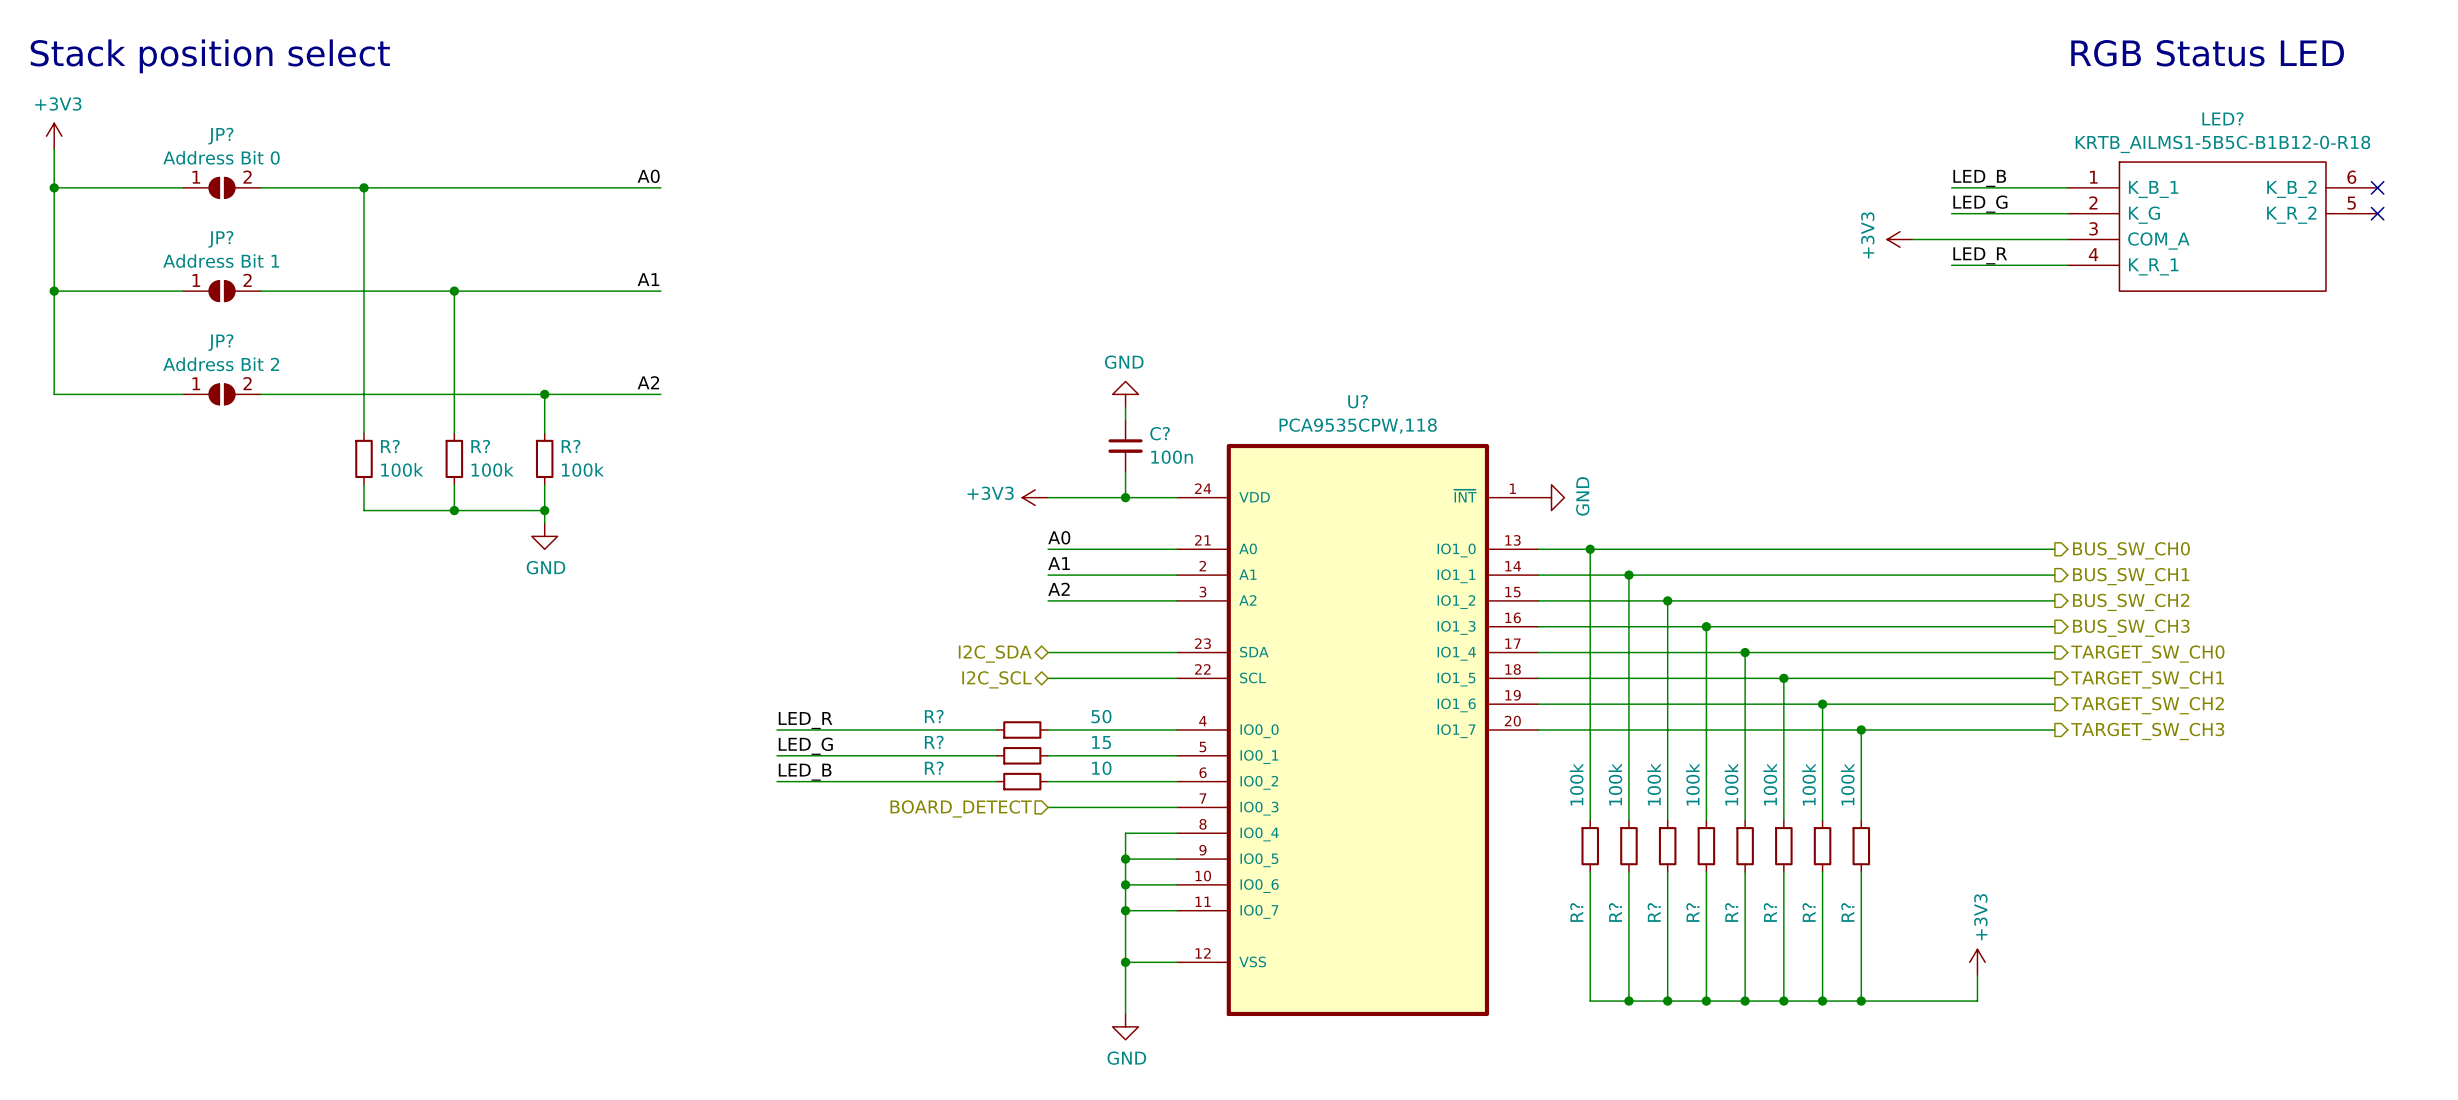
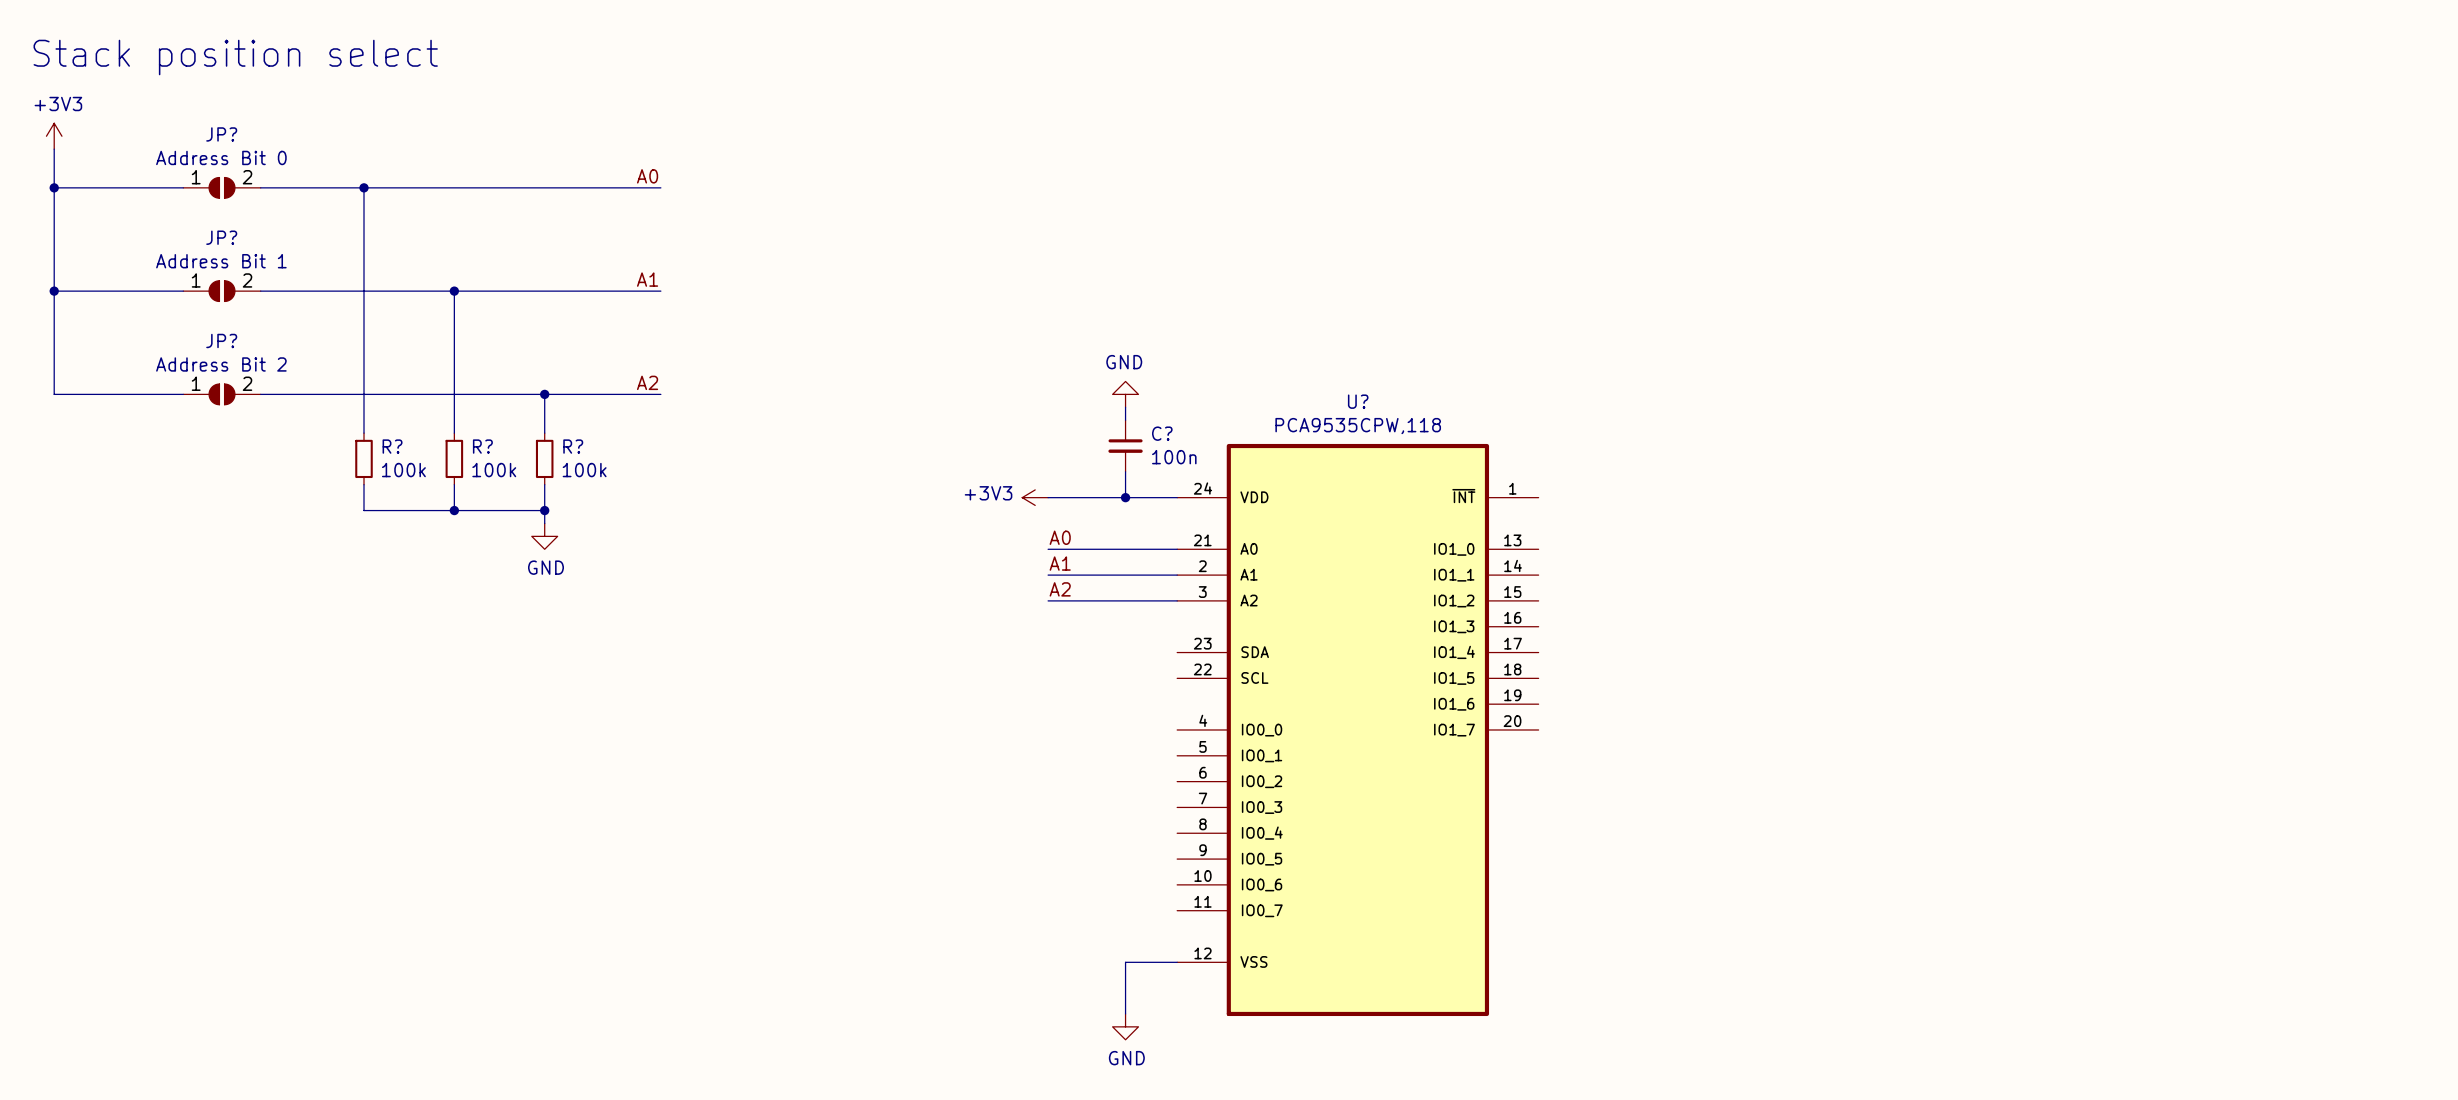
text: RGB Status LED (2207, 53) -> none
label: LED_B (1979, 178) -> none
wire: (1951, 187) (2067, 187) -> none
no-connect mark: (2377, 187) -> none
label: LED_G (1980, 204) -> none
wire: (1951, 213) (2067, 213) -> none
no-connect mark: (2377, 213) -> none
LED?: KRTB_AILMS1-5B5C-B1B12-0-R18 (2222, 226) -> none
power symbol: +3V3 (1900, 239) -> none
wire: (1912, 239) (2067, 239) -> none
label: LED_R (1980, 255) -> none
wire: (1951, 265) (2067, 265) -> none
power symbol: GND (1551, 497) -> none
wire: (1538, 549) (2054, 549) -> none
wire: (1590, 549) (1590, 820) -> none
junction: (1590, 549) -> none
hierarchical label: BUS_SW_CH0 (2131, 550) -> none
wire: (1538, 575) (2054, 575) -> none
wire: (1628, 575) (1628, 820) -> none
junction: (1628, 575) -> none
hierarchical label: BUS_SW_CH1 (2131, 576) -> none
wire: (1538, 600) (2054, 600) -> none
wire: (1667, 600) (1667, 820) -> none
junction: (1667, 600) -> none
hierarchical label: BUS_SW_CH2 (2131, 602) -> none
wire: (1538, 626) (2054, 626) -> none
wire: (1706, 626) (1706, 820) -> none
junction: (1706, 626) -> none
hierarchical label: BUS_SW_CH3 (2131, 628) -> none
wire: (1048, 652) (1177, 652) -> none
wire: (1538, 652) (2054, 652) -> none
wire: (1745, 652) (1745, 820) -> none
junction: (1745, 652) -> none
hierarchical label: I2C_SDA (995, 654) -> none
hierarchical label: TARGET_SW_CH0 (2147, 654) -> none
wire: (1048, 678) (1177, 678) -> none
wire: (1538, 678) (2054, 678) -> none
wire: (1783, 678) (1783, 820) -> none
junction: (1783, 678) -> none
hierarchical label: I2C_SCL (996, 679) -> none
hierarchical label: TARGET_SW_CH1 (2147, 679) -> none
wire: (1538, 704) (2054, 704) -> none
wire: (1822, 704) (1822, 820) -> none
junction: (1822, 704) -> none
hierarchical label: TARGET_SW_CH2 (2147, 705) -> none
label: LED_R (805, 720) -> none
wire: (777, 729) (996, 729) -> none
R?: 50 (1022, 729) -> none
wire: (1048, 729) (1177, 729) -> none
wire: (1538, 729) (2054, 729) -> none
wire: (1861, 729) (1861, 820) -> none
junction: (1861, 729) -> none
hierarchical label: TARGET_SW_CH3 (2147, 731) -> none
label: LED_G (805, 746) -> none
wire: (777, 755) (996, 755) -> none
R?: 15 (1022, 755) -> none
wire: (1048, 755) (1177, 755) -> none
label: LED_B (805, 772) -> none
wire: (777, 781) (996, 781) -> none
R?: 10 (1022, 781) -> none
wire: (1048, 781) (1177, 781) -> none
wire: (1048, 807) (1177, 807) -> none
hierarchical label: BOARD_DETECT (961, 808) -> none
wire: (1177, 833) (1125, 833) (1125, 962) -> none
R?: 100k (1590, 846) -> none
R?: 100k (1628, 846) -> none
R?: 100k (1667, 846) -> none
R?: 100k (1706, 846) -> none
R?: 100k (1745, 846) -> none
R?: 100k (1783, 846) -> none
R?: 100k (1822, 846) -> none
R?: 100k (1861, 846) -> none
wire: (1125, 859) (1177, 859) -> none
junction: (1125, 859) -> none
wire: (1590, 871) (1590, 1001) (1977, 1001) (1977, 975) -> none
wire: (1628, 871) (1628, 1001) -> none
wire: (1667, 871) (1667, 1001) -> none
wire: (1706, 871) (1706, 1001) -> none
wire: (1745, 871) (1745, 1001) -> none
wire: (1783, 871) (1783, 1001) -> none
wire: (1822, 871) (1822, 1001) -> none
wire: (1861, 871) (1861, 1001) -> none
wire: (1125, 884) (1177, 884) -> none
junction: (1125, 884) -> none
wire: (1125, 910) (1177, 910) -> none
junction: (1125, 910) -> none
junction: (1125, 962) -> none
power symbol: +3V3 (1977, 962) -> none
junction: (1628, 1001) -> none
junction: (1667, 1001) -> none
junction: (1706, 1001) -> none
junction: (1745, 1001) -> none
junction: (1783, 1001) -> none
junction: (1822, 1001) -> none
junction: (1861, 1001) -> none

